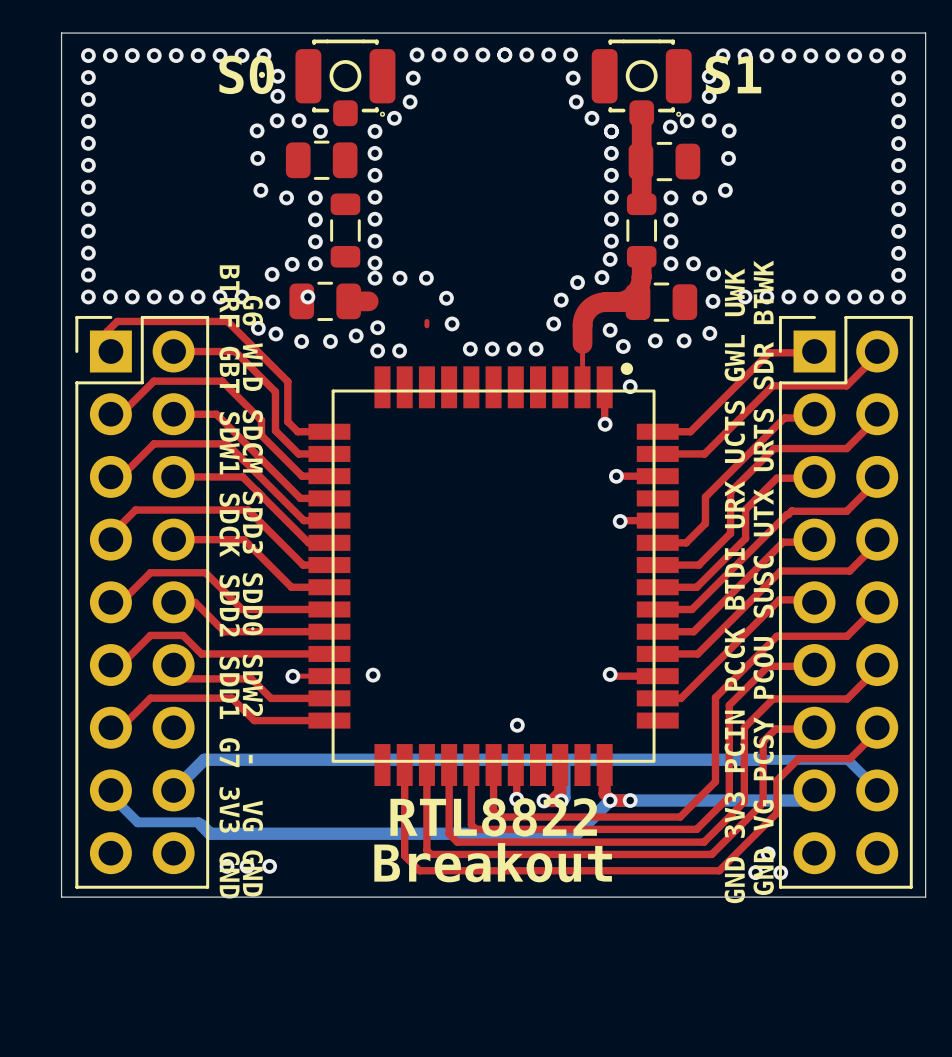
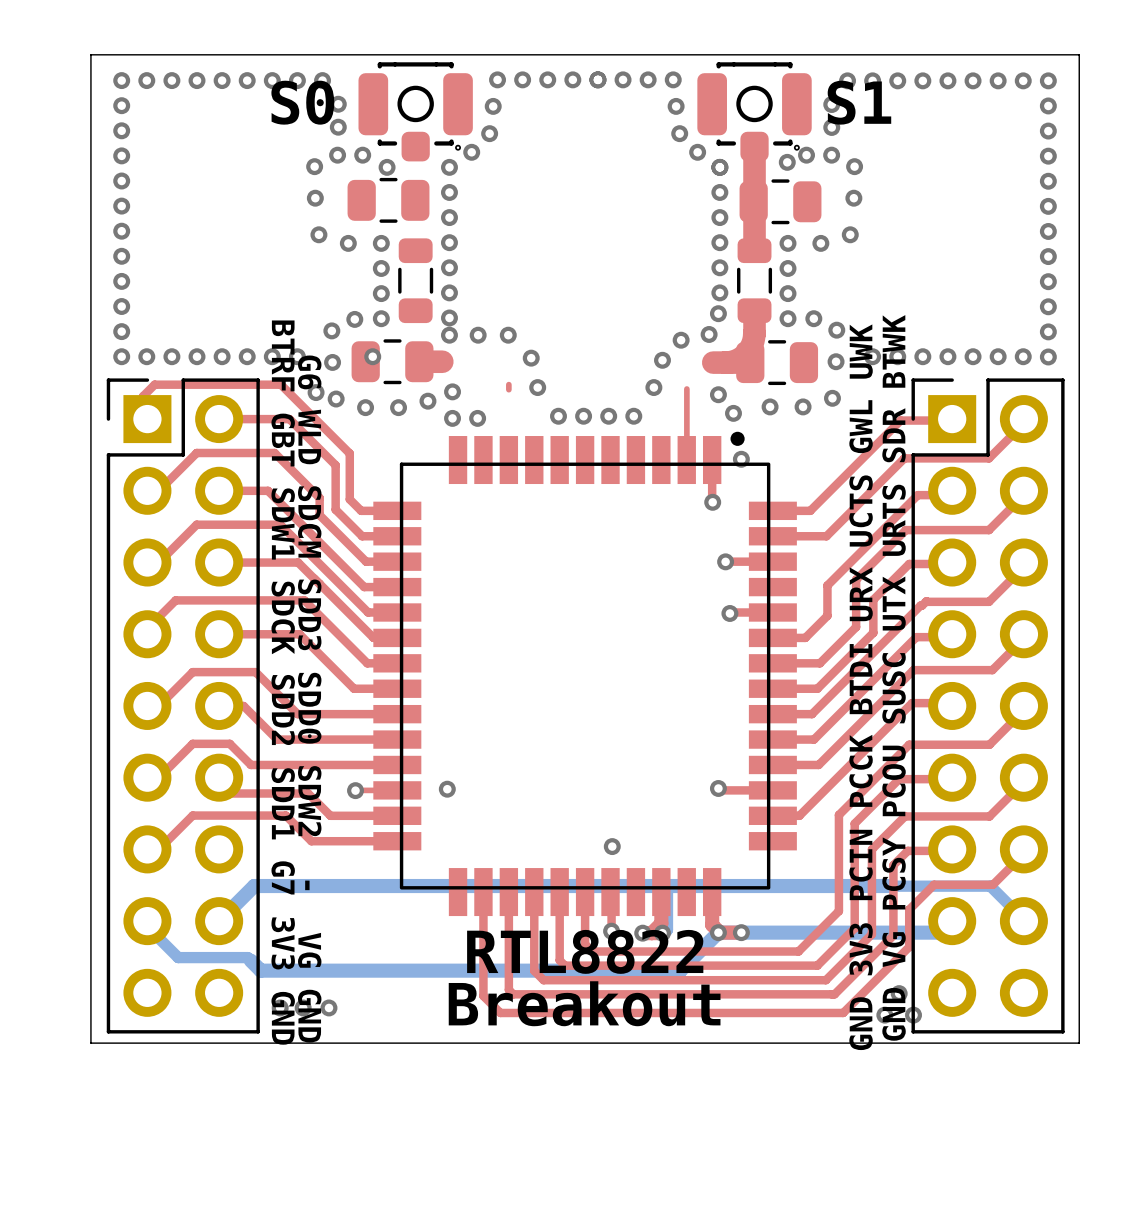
top track: (605, 302) (593, 305) (584, 315) (582, 322) (582, 344) -> none

